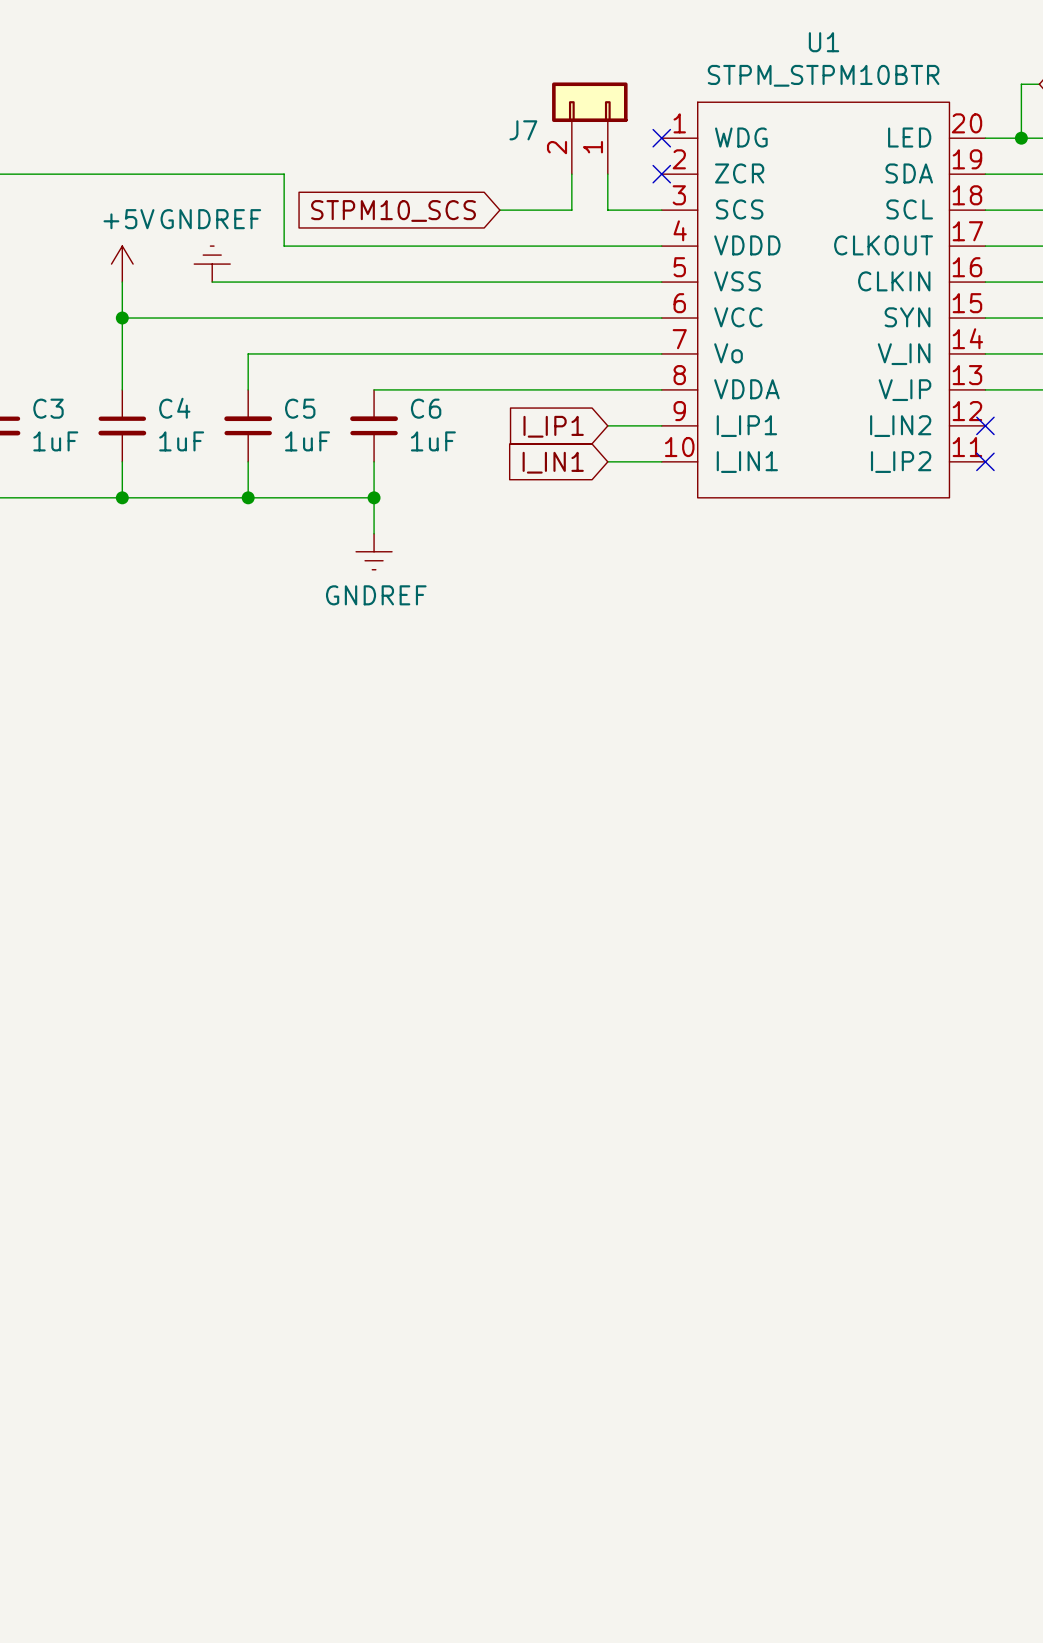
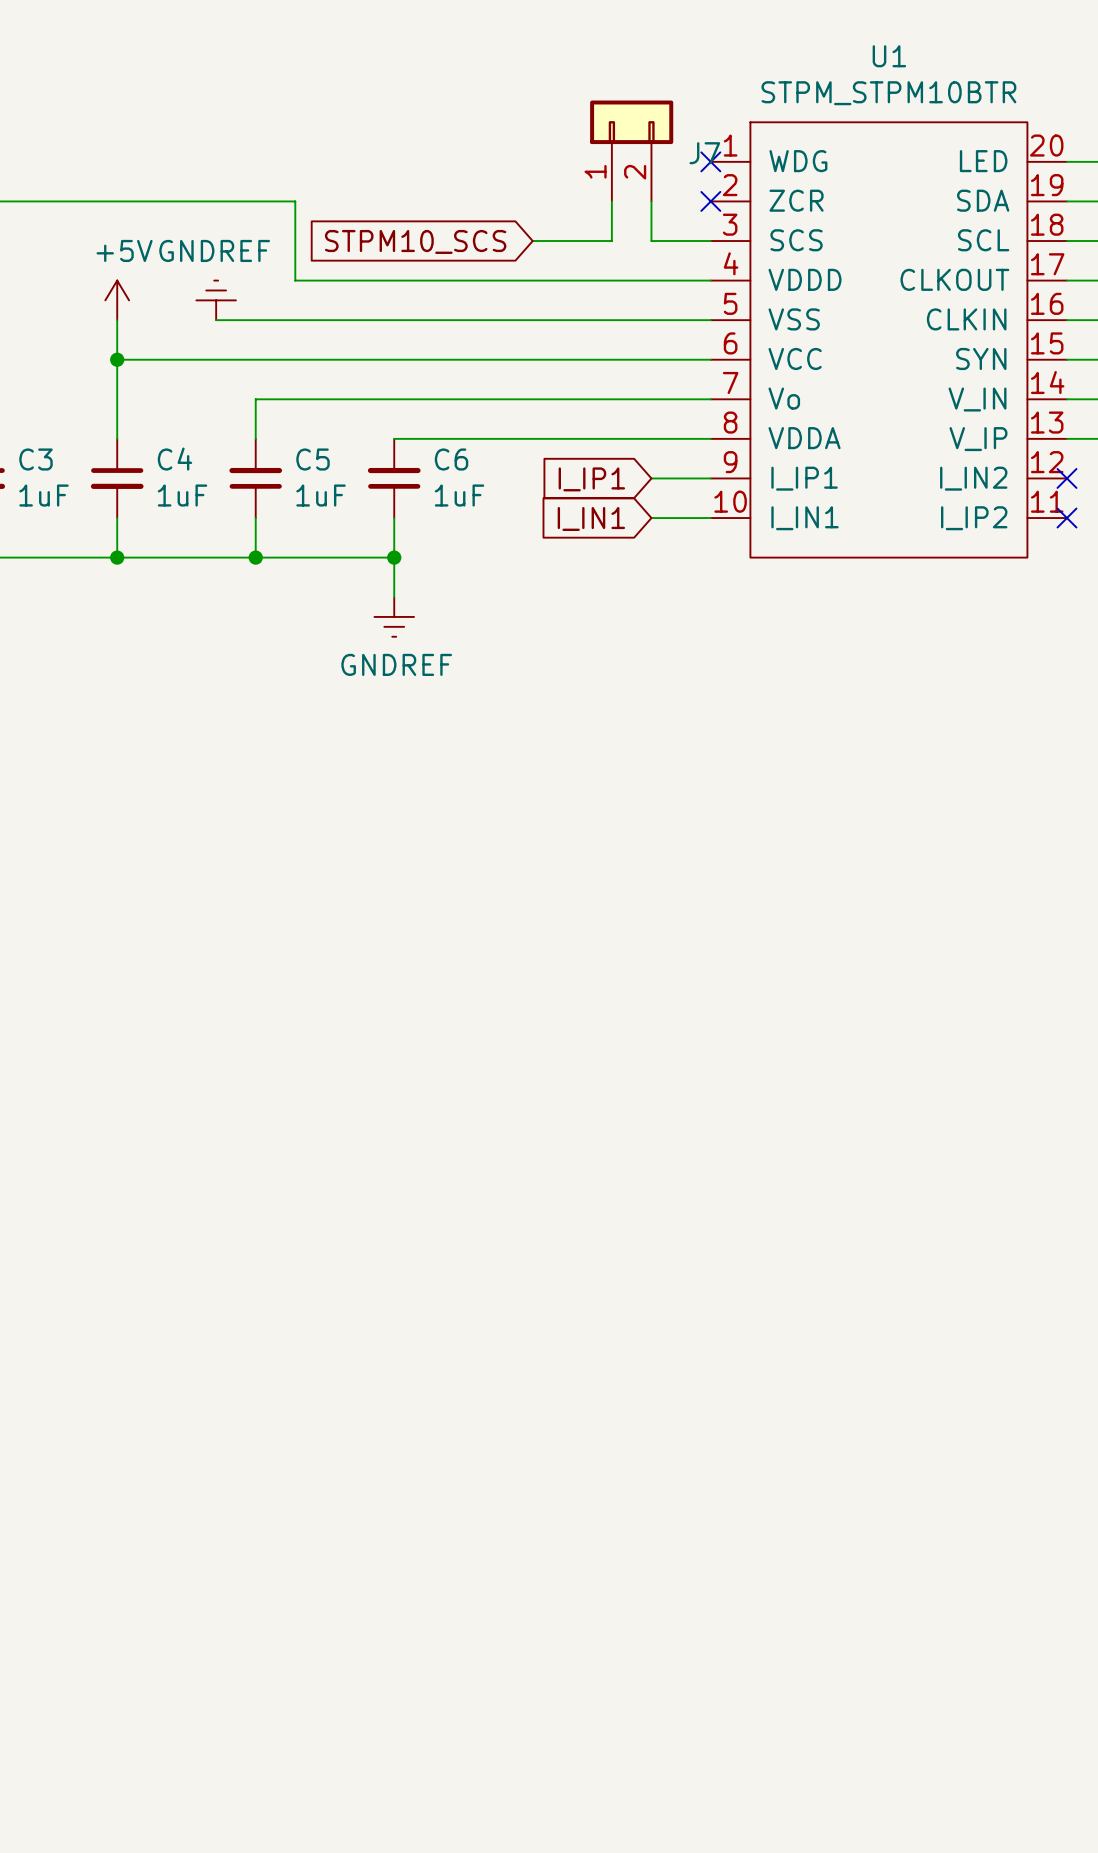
J7 flip: as is (589, 102) -> left-right (631, 122)

